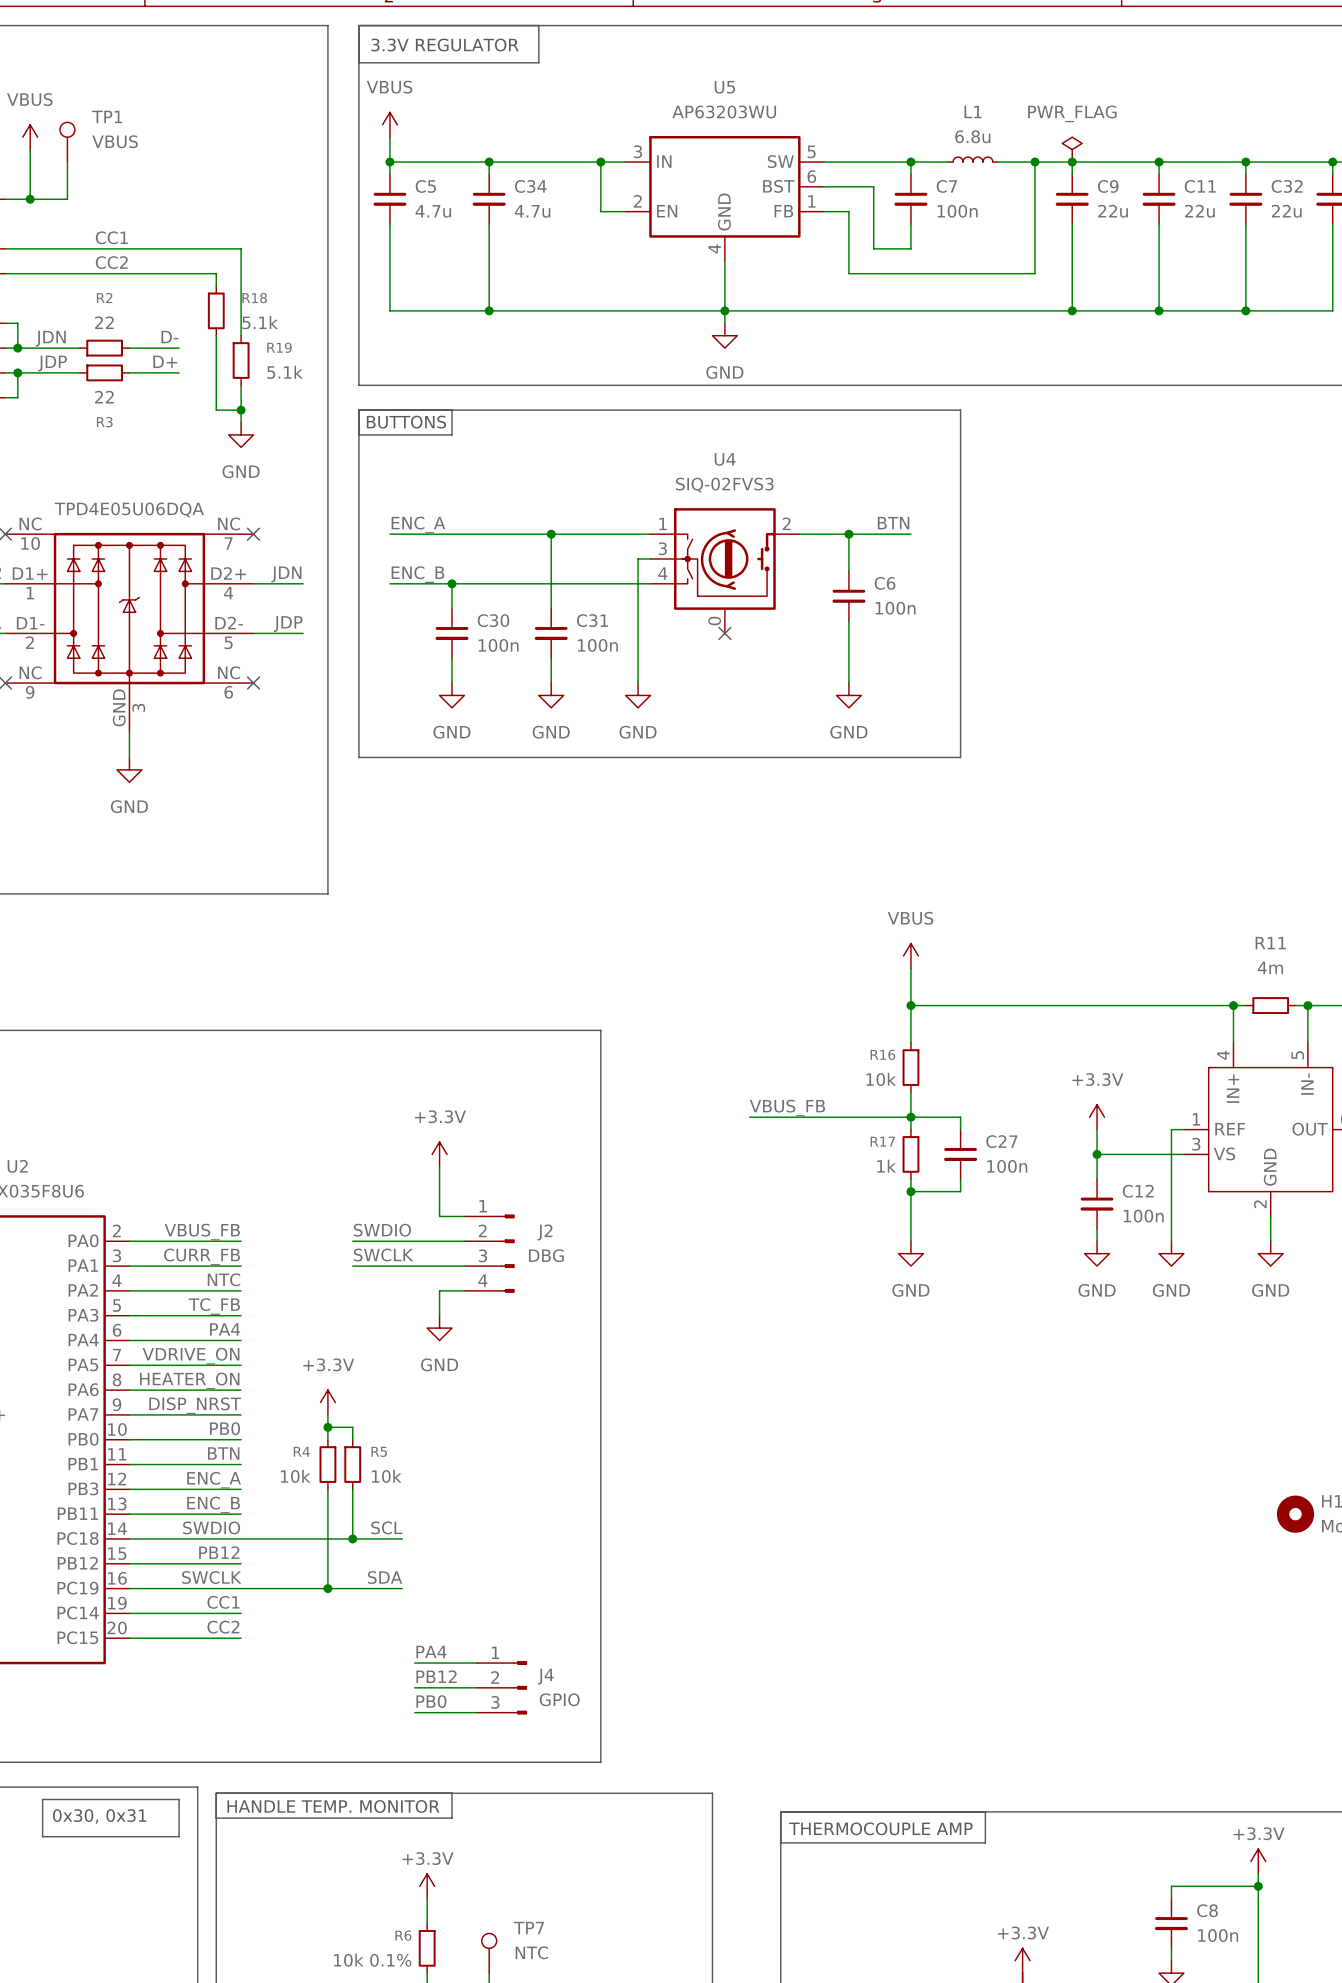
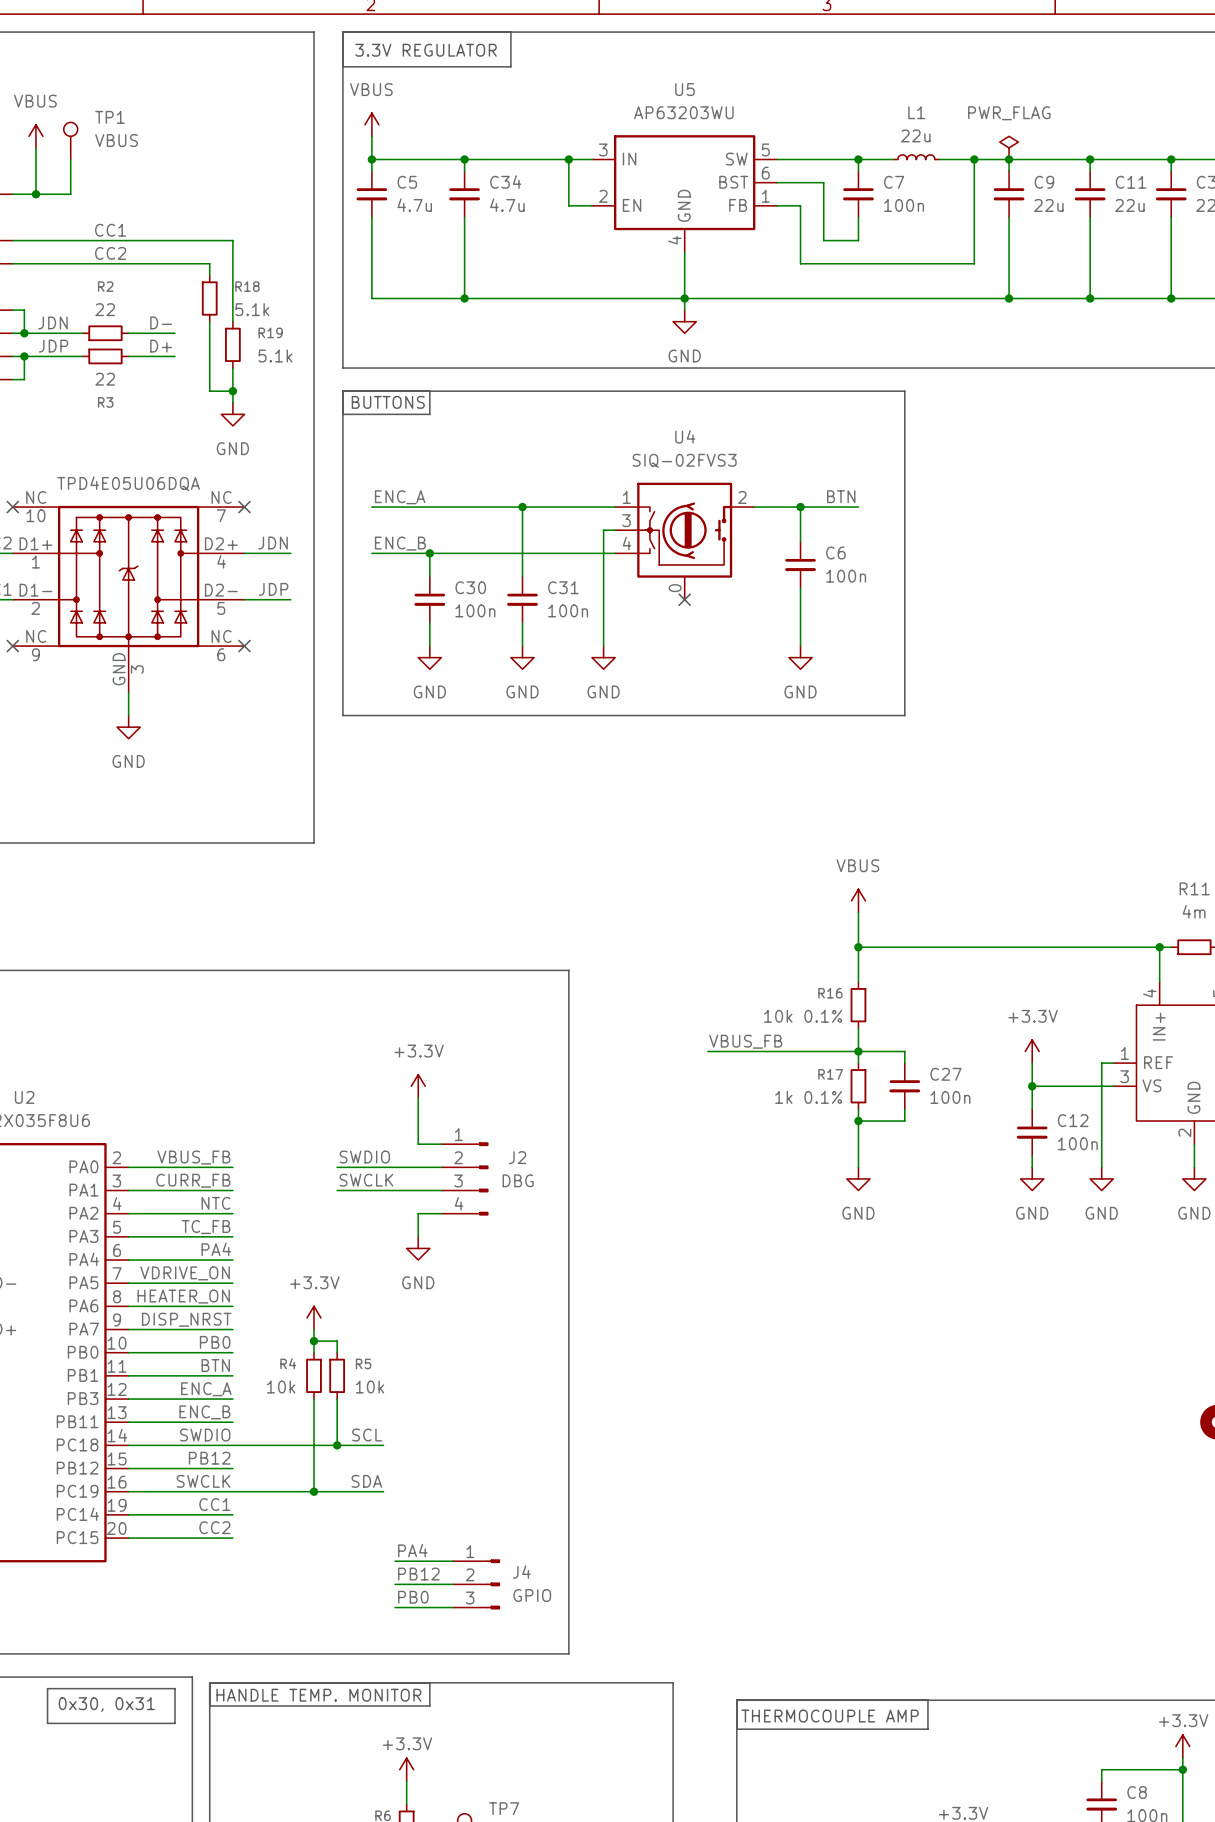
L1 value: 6.8u (972, 136) -> 22u (915, 135)
R16 value: 10k (881, 1079) -> 10k 0.1% (803, 1016)
R17 value: 1k (886, 1166) -> 1k 0.1% (808, 1097)

